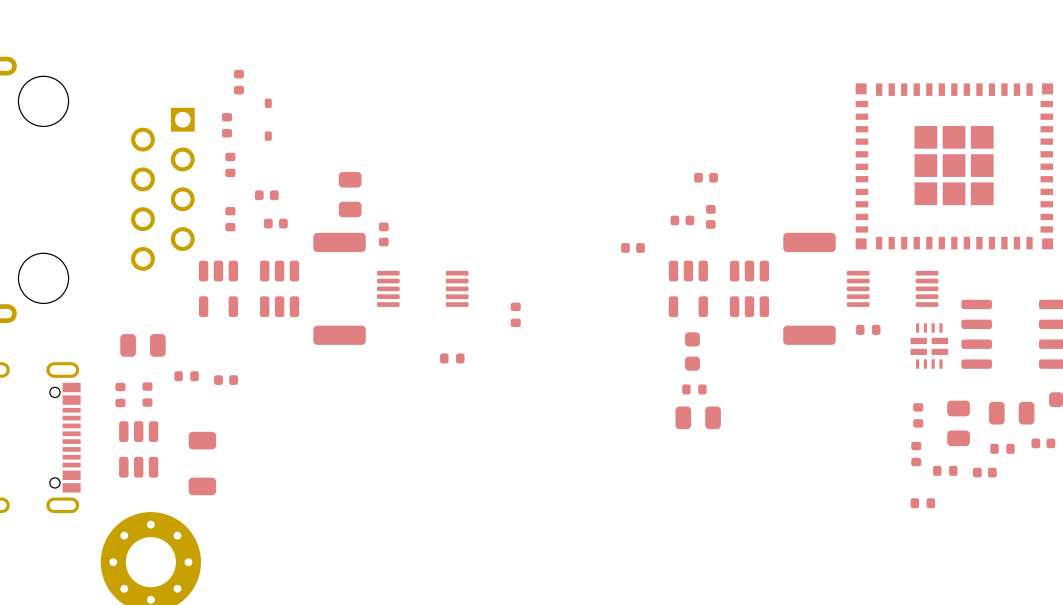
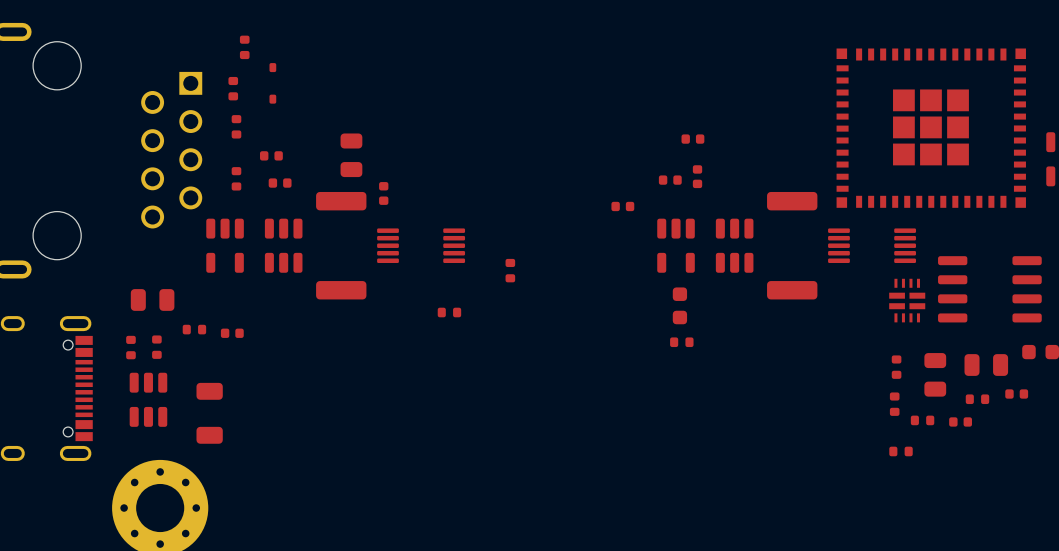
part: (868, 329) -> none
part: (698, 417) -> none

